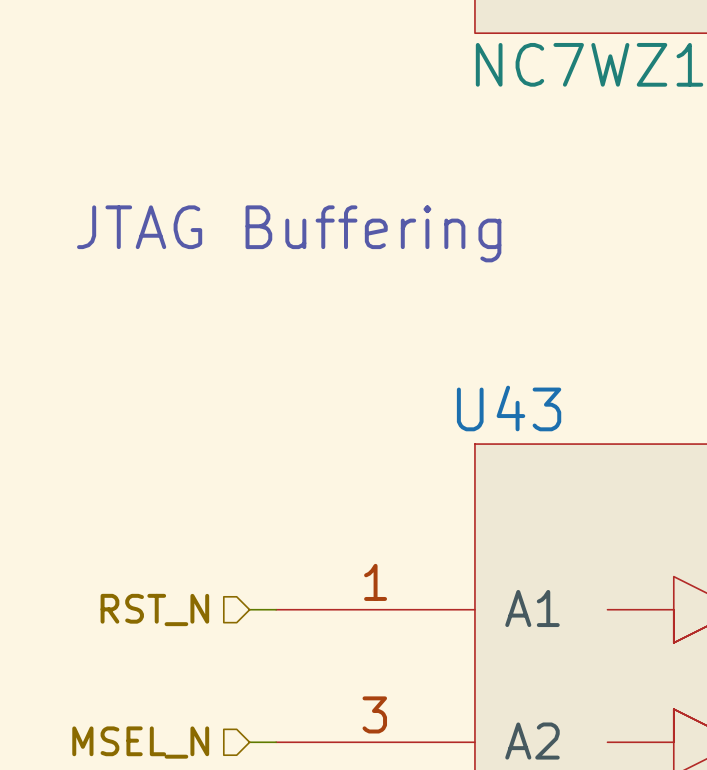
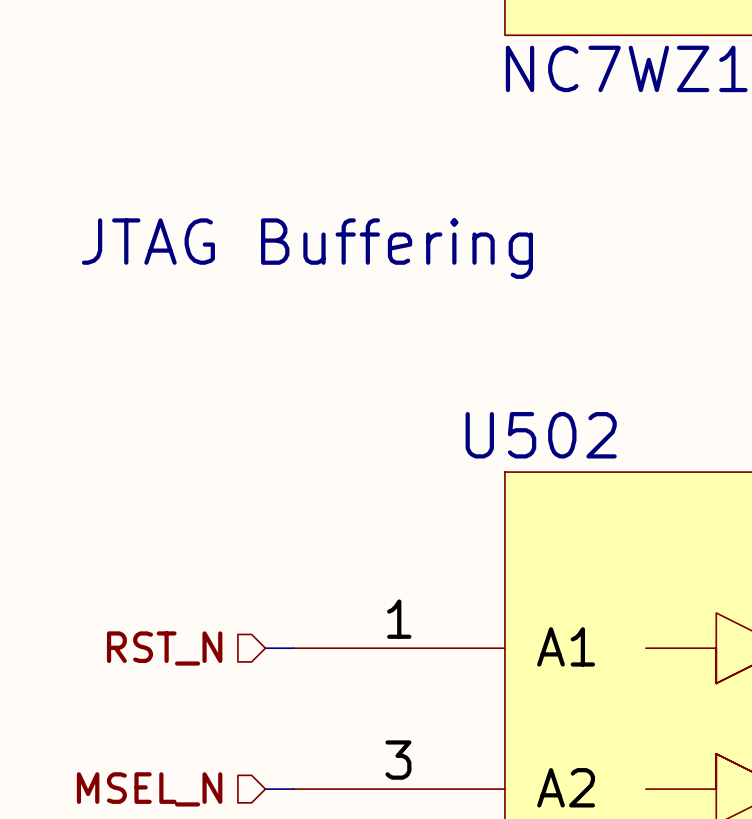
U43 name: U43 (509, 408) -> U502 (541, 435)

